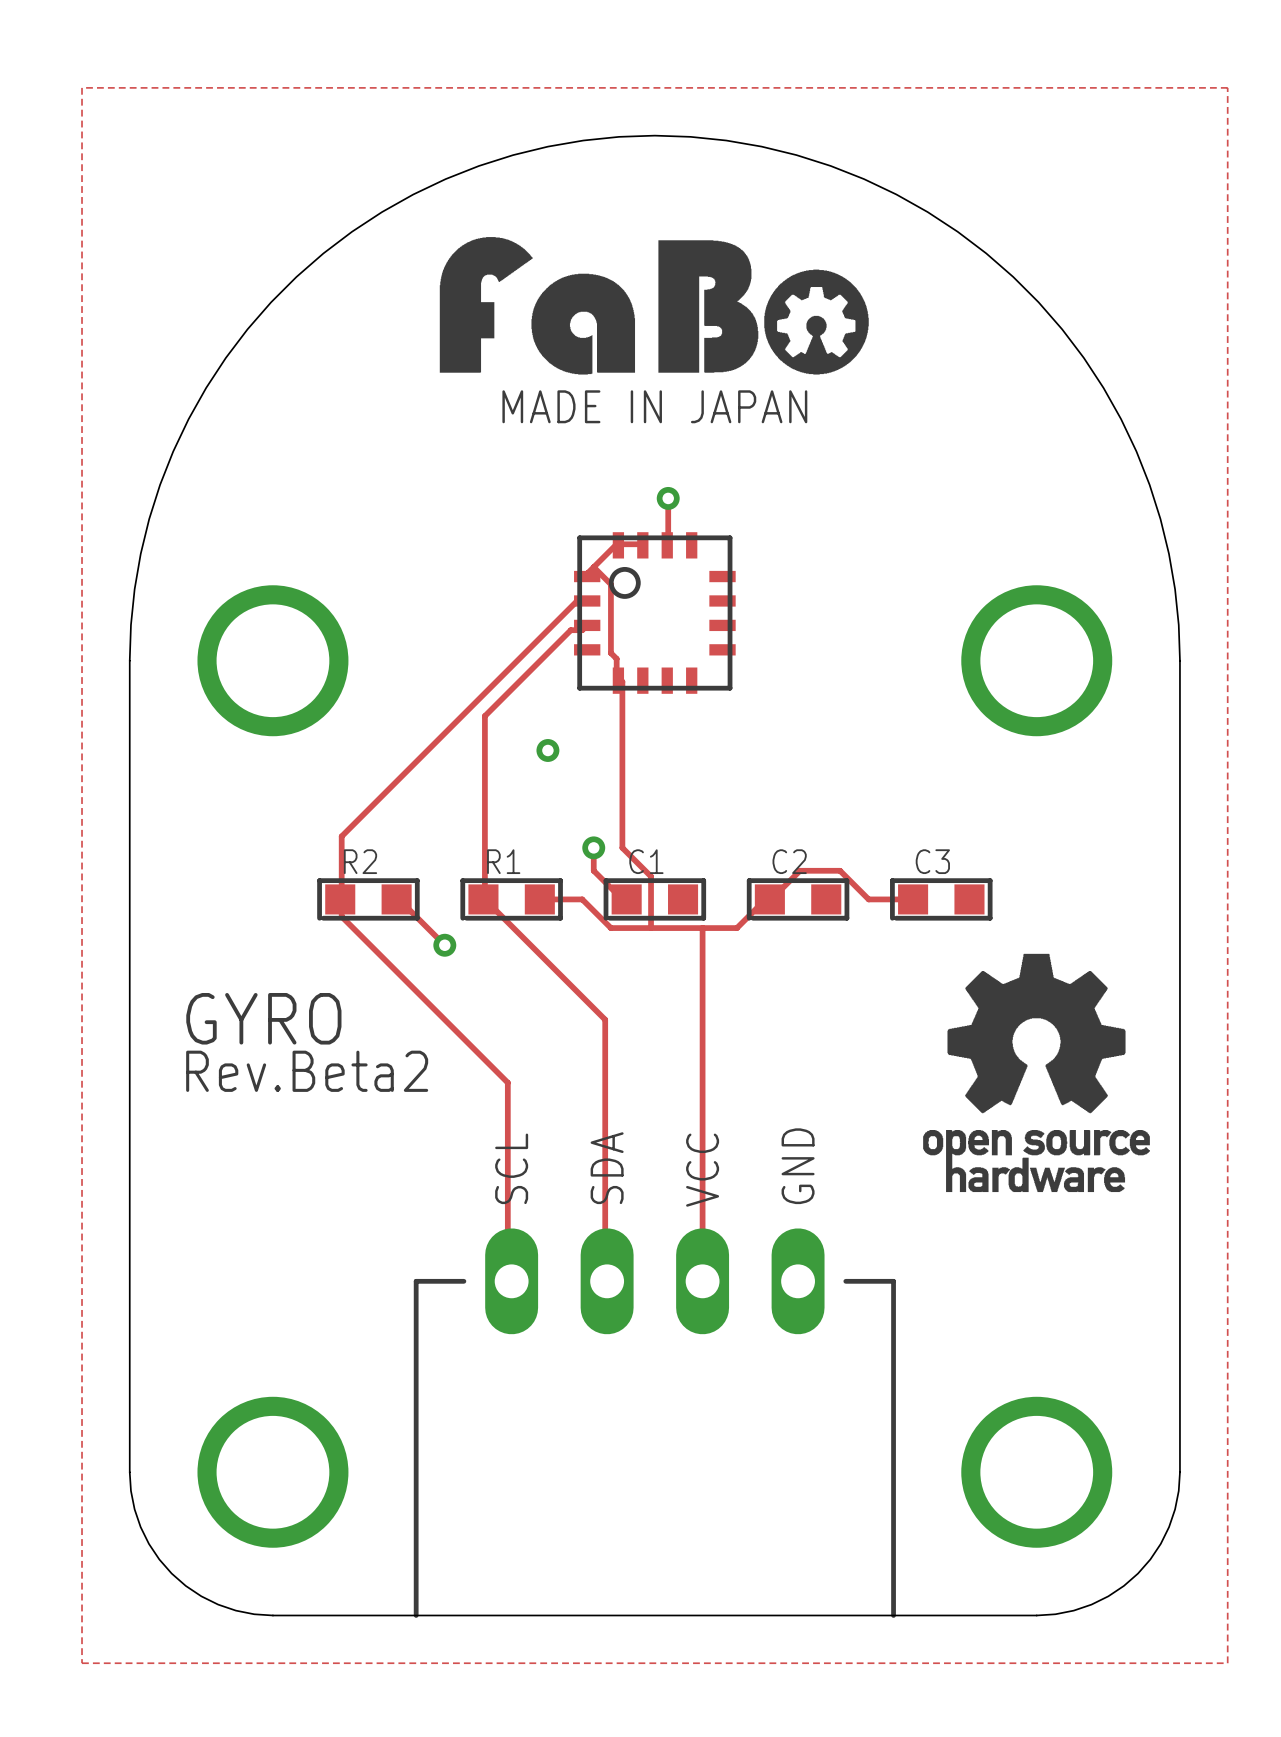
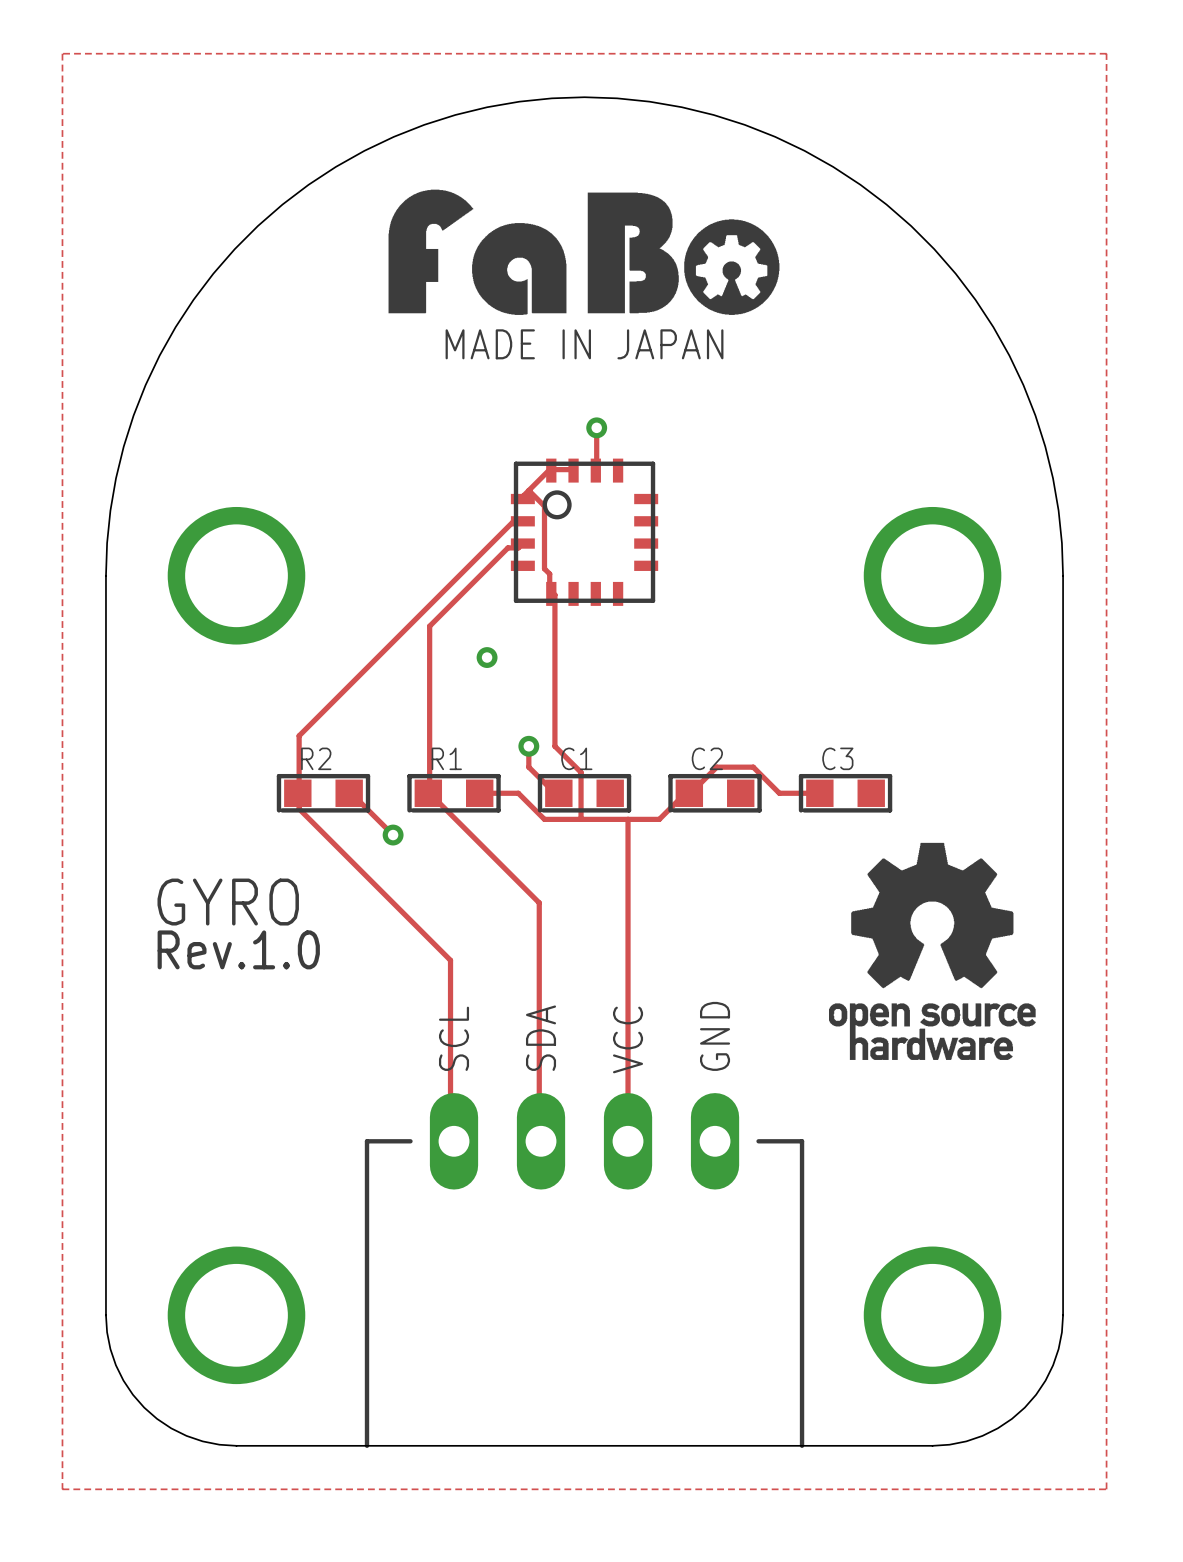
text: Rev.Beta2 (307, 1071) -> Rev.1.0 (238, 949)

